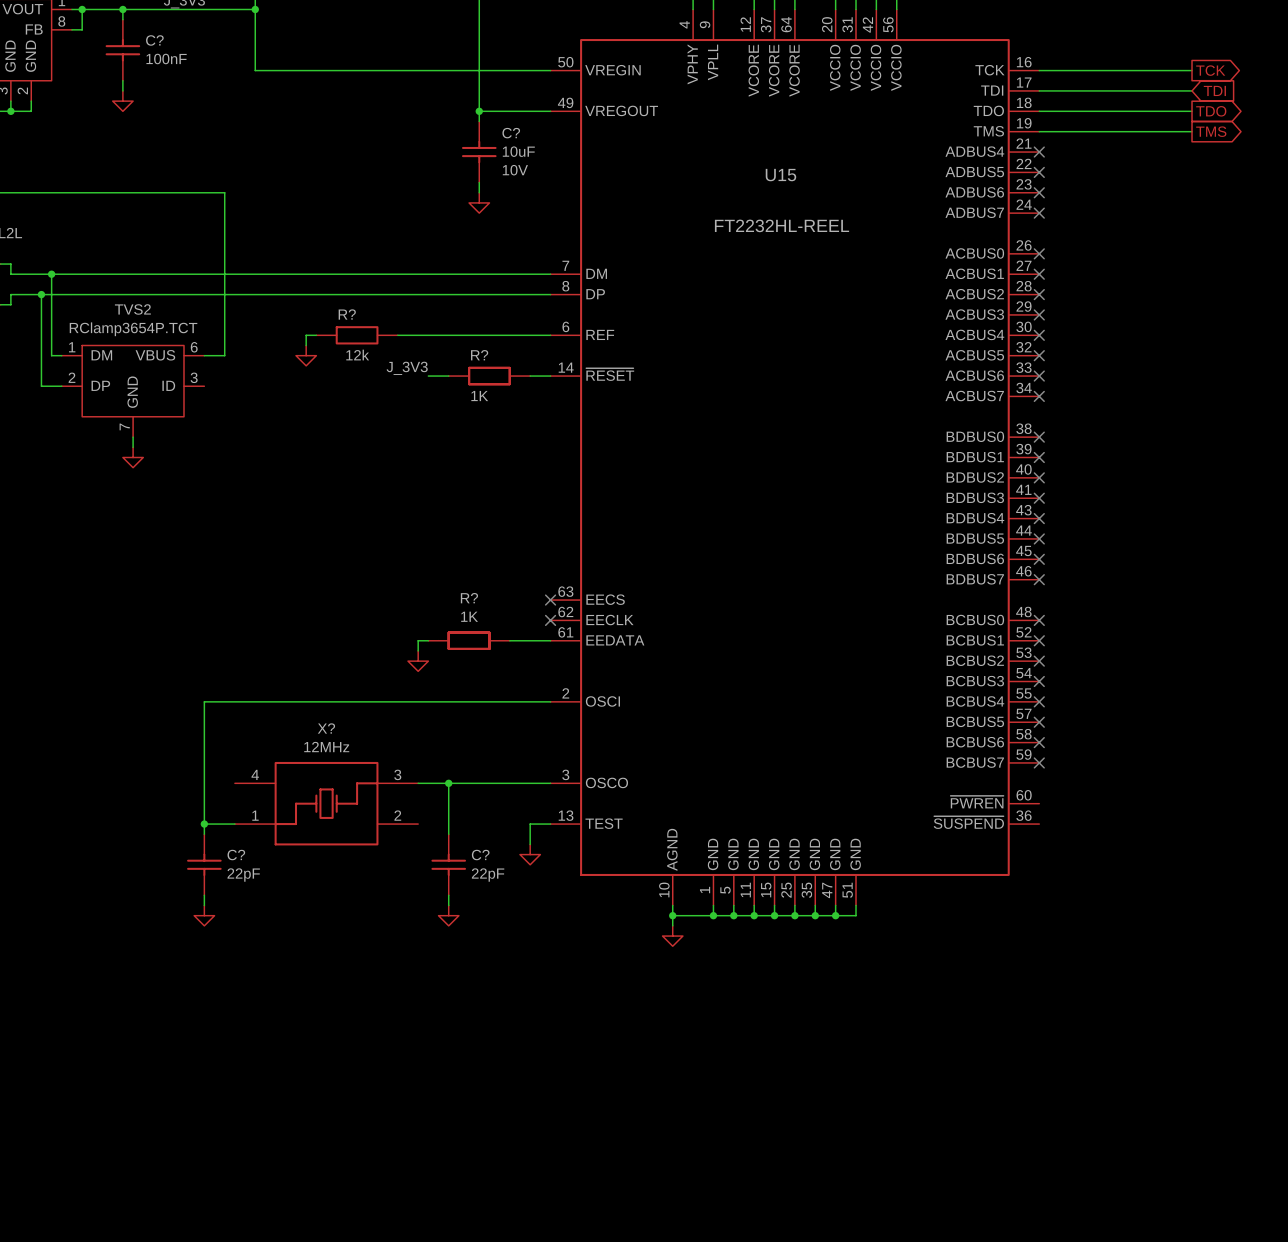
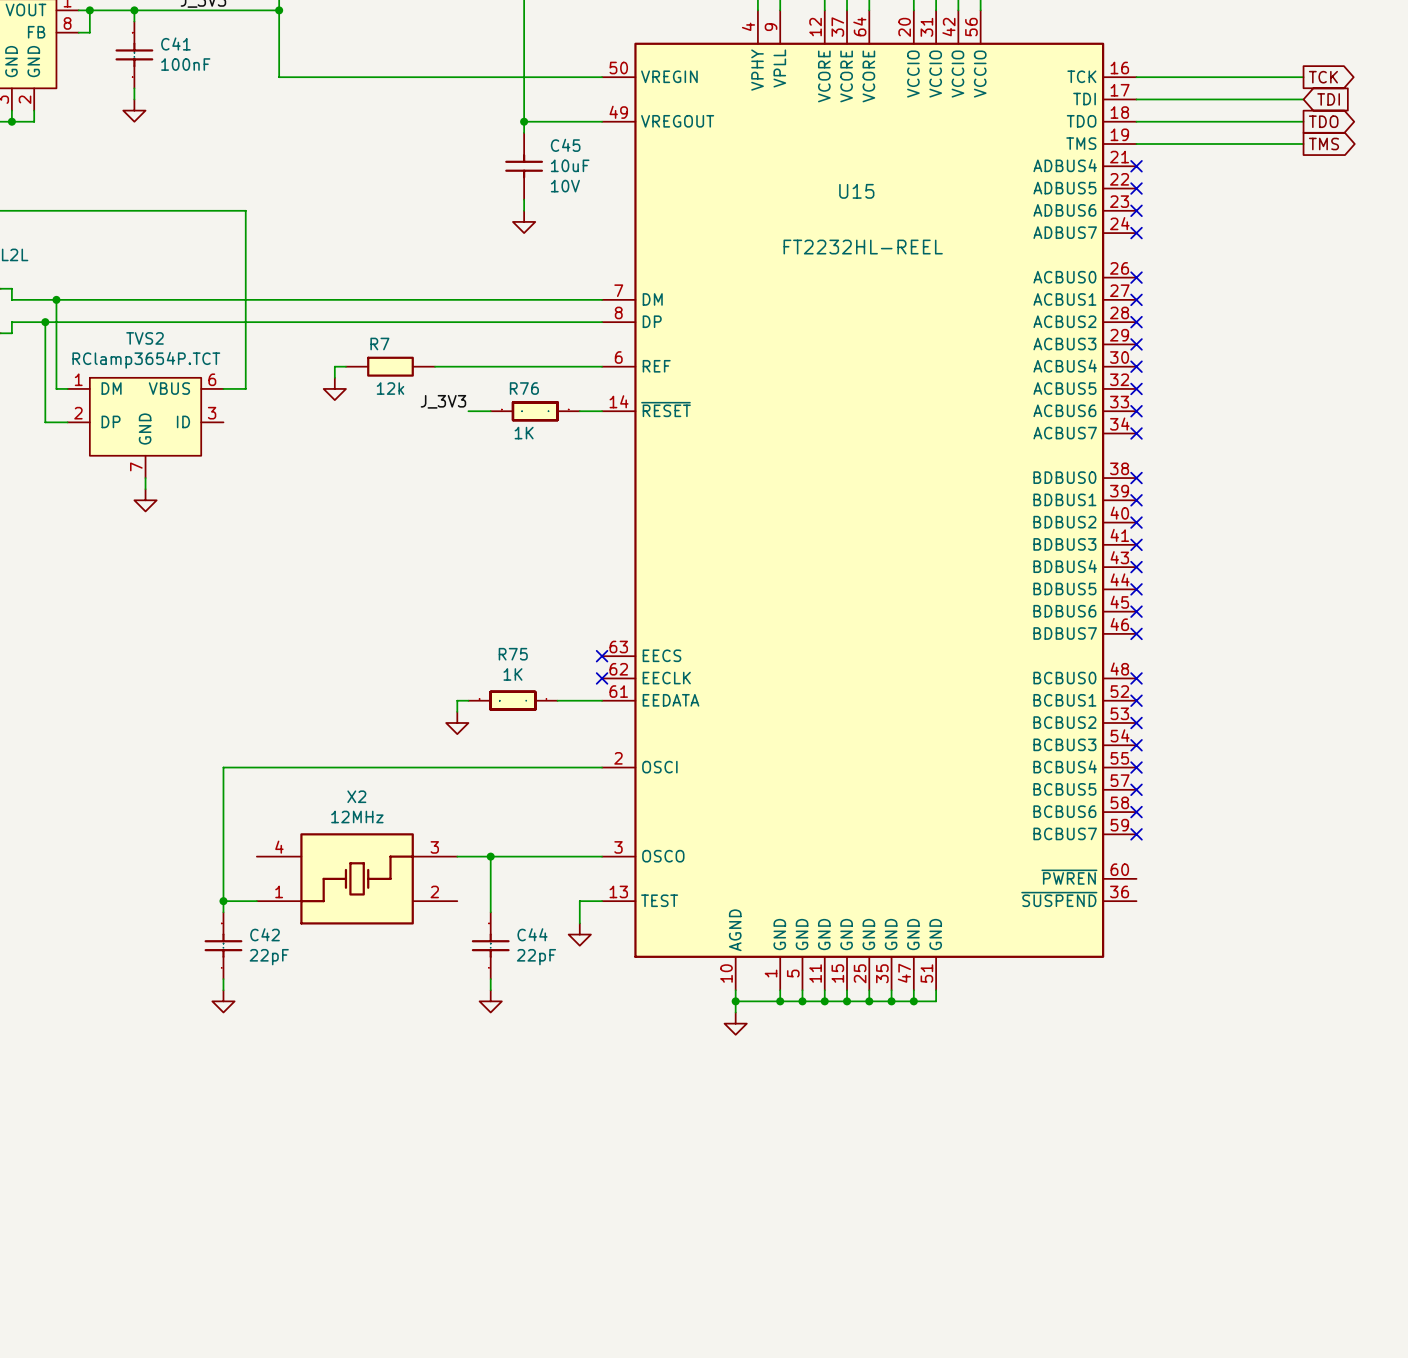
C? name: C? (154, 40) -> C41 (175, 43)
C? name: C? (511, 133) -> C45 (565, 145)
R? name: R? (347, 314) -> R7 (379, 344)
R? name: R? (479, 355) -> R76 (524, 388)
R? name: R? (469, 598) -> R75 (513, 654)
X? name: X? (326, 728) -> X2 (356, 796)
C? name: C? (236, 855) -> C42 (265, 934)
C? name: C? (480, 855) -> C44 (532, 934)

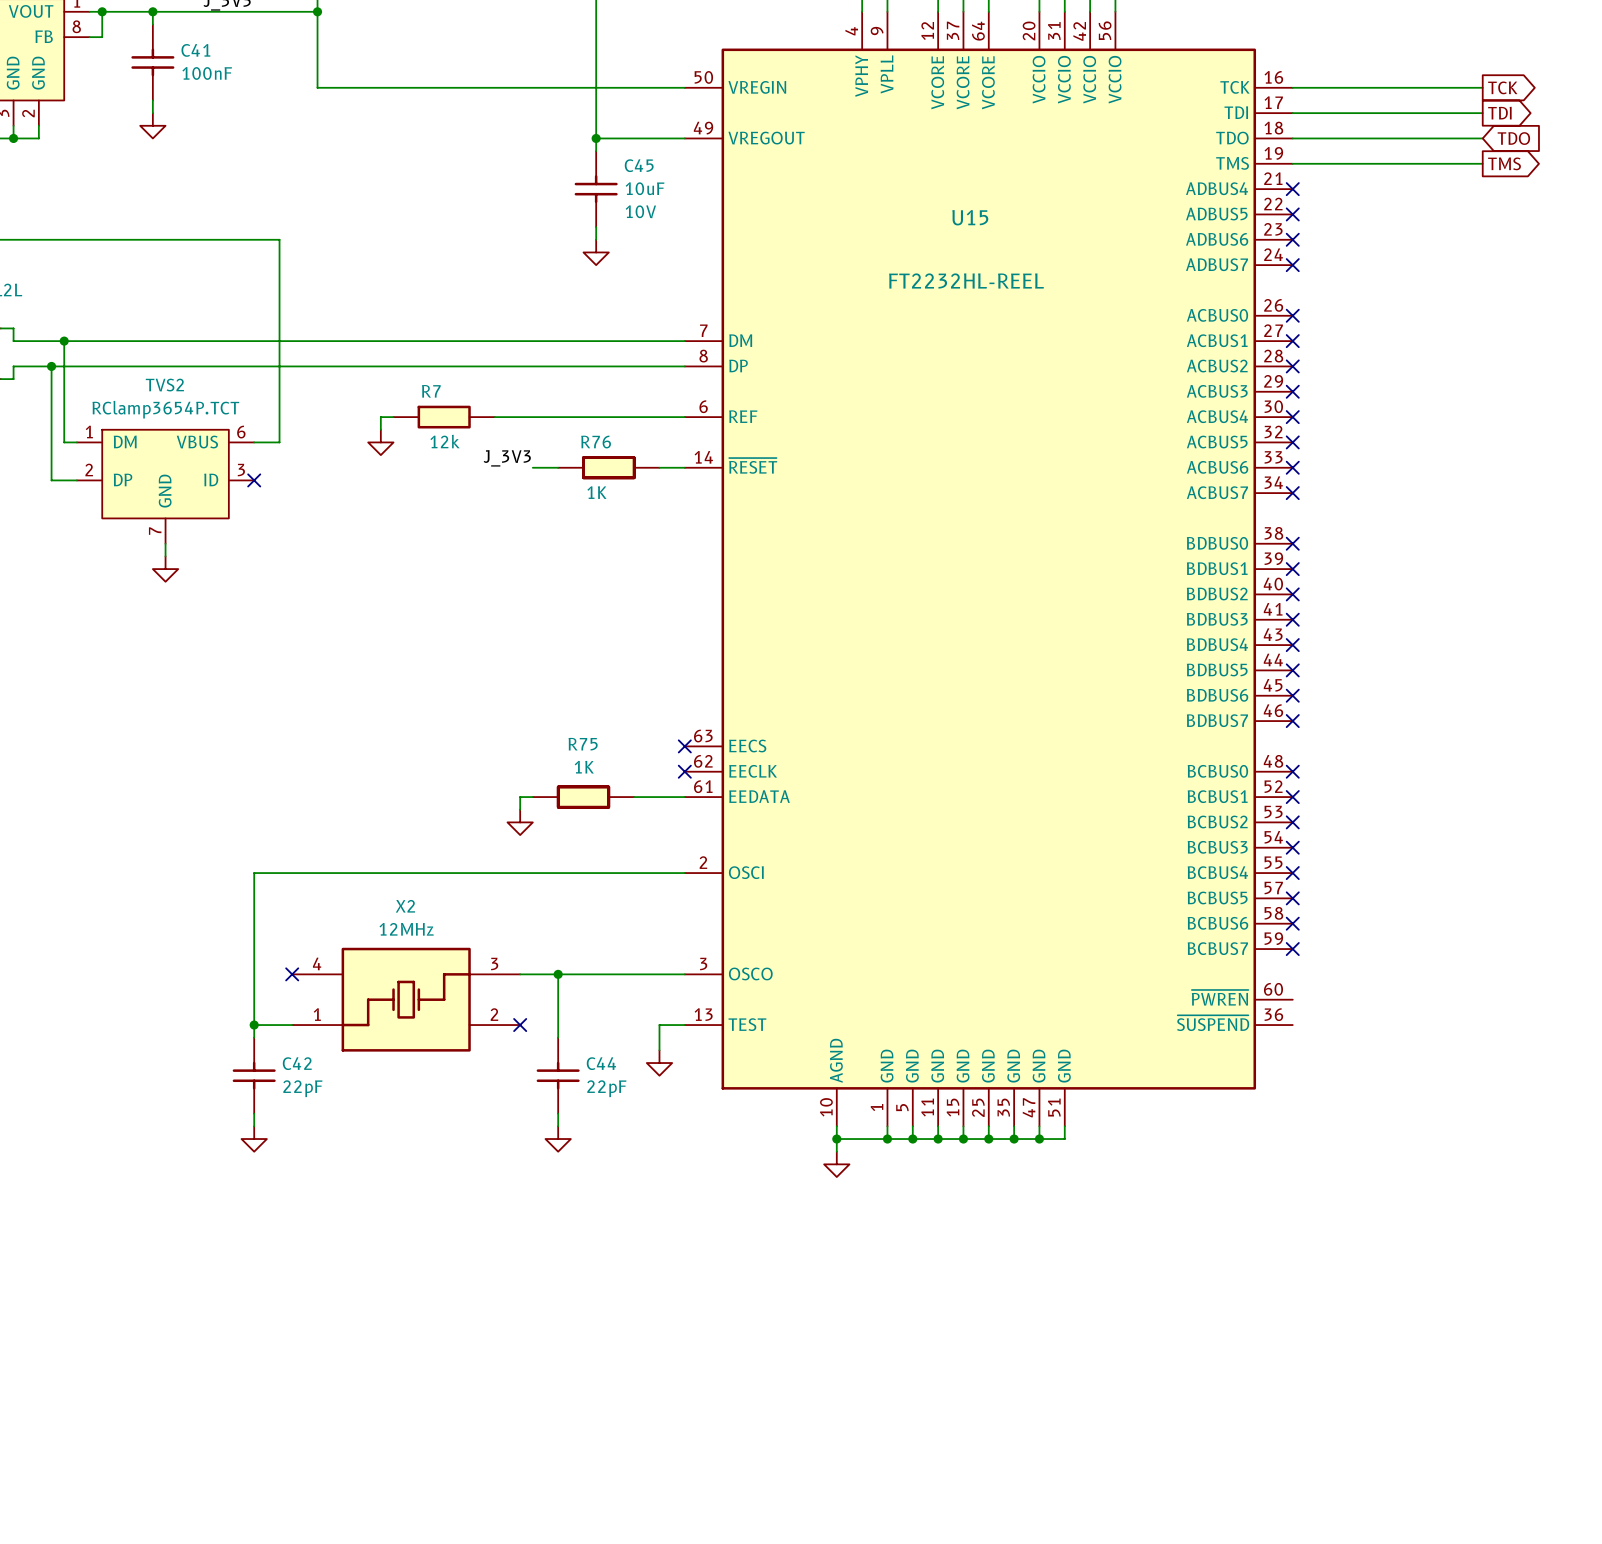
global label shape: input (1328, 99) -> output (1499, 113)
global label shape: output (1323, 121) -> input (1513, 138)
no-connect mark: none -> (254, 480)
no-connect mark: none -> (292, 974)
no-connect mark: none -> (520, 1025)

